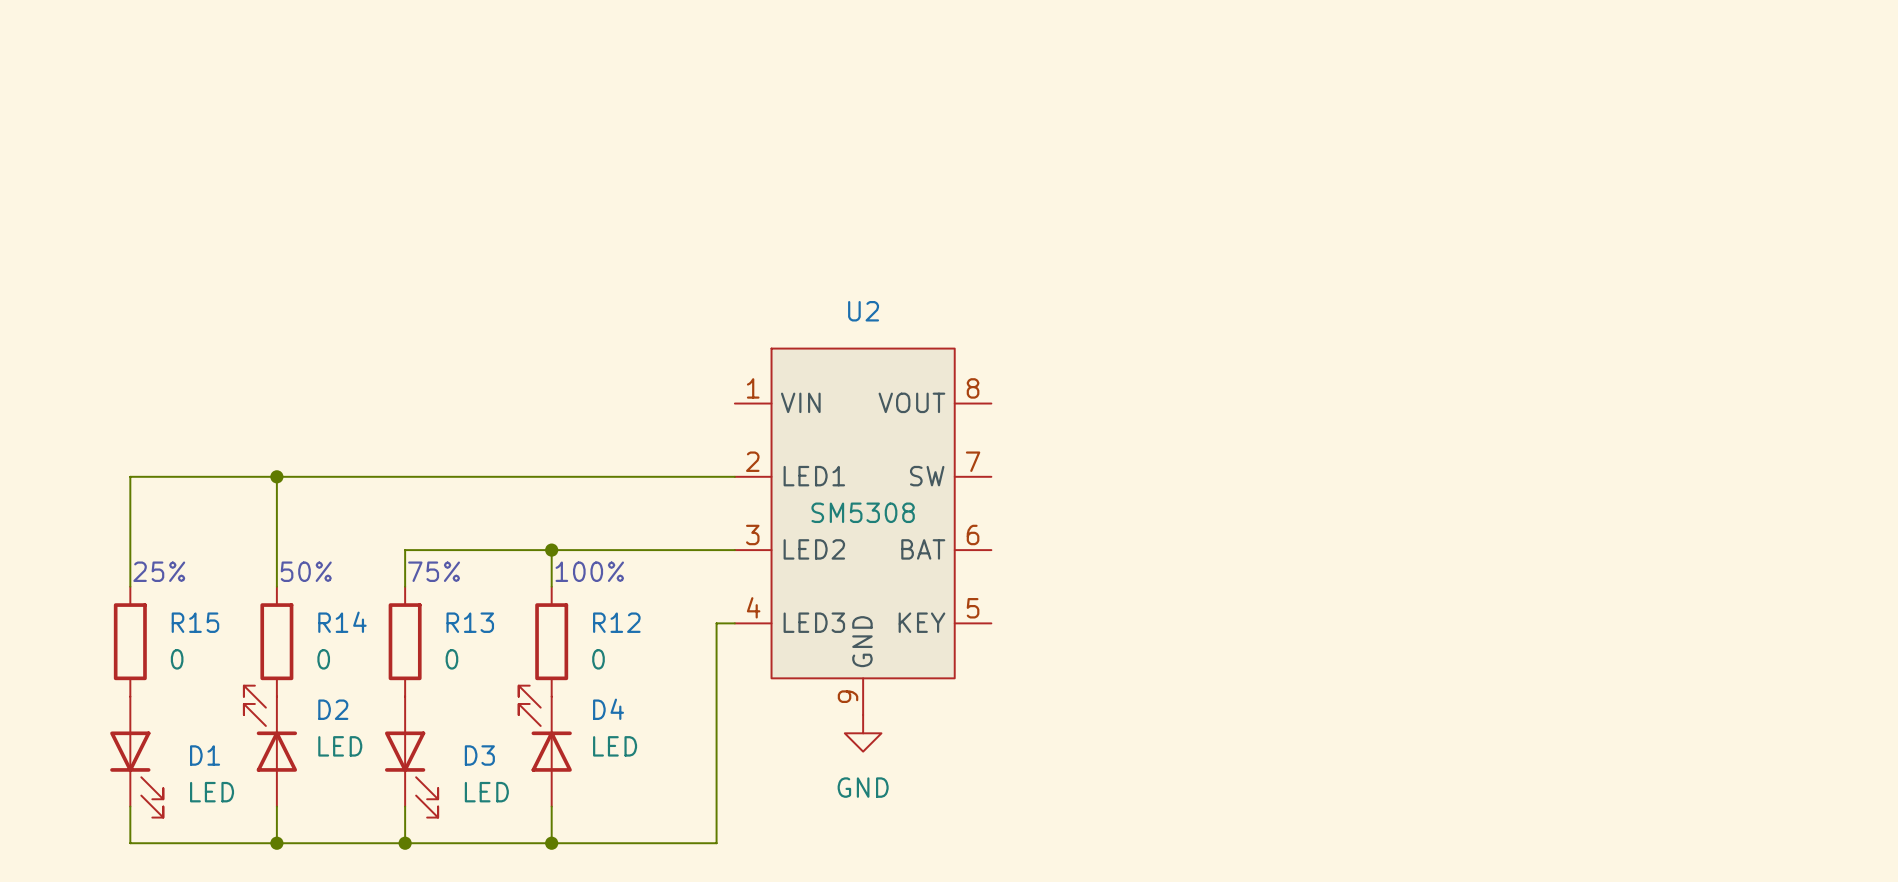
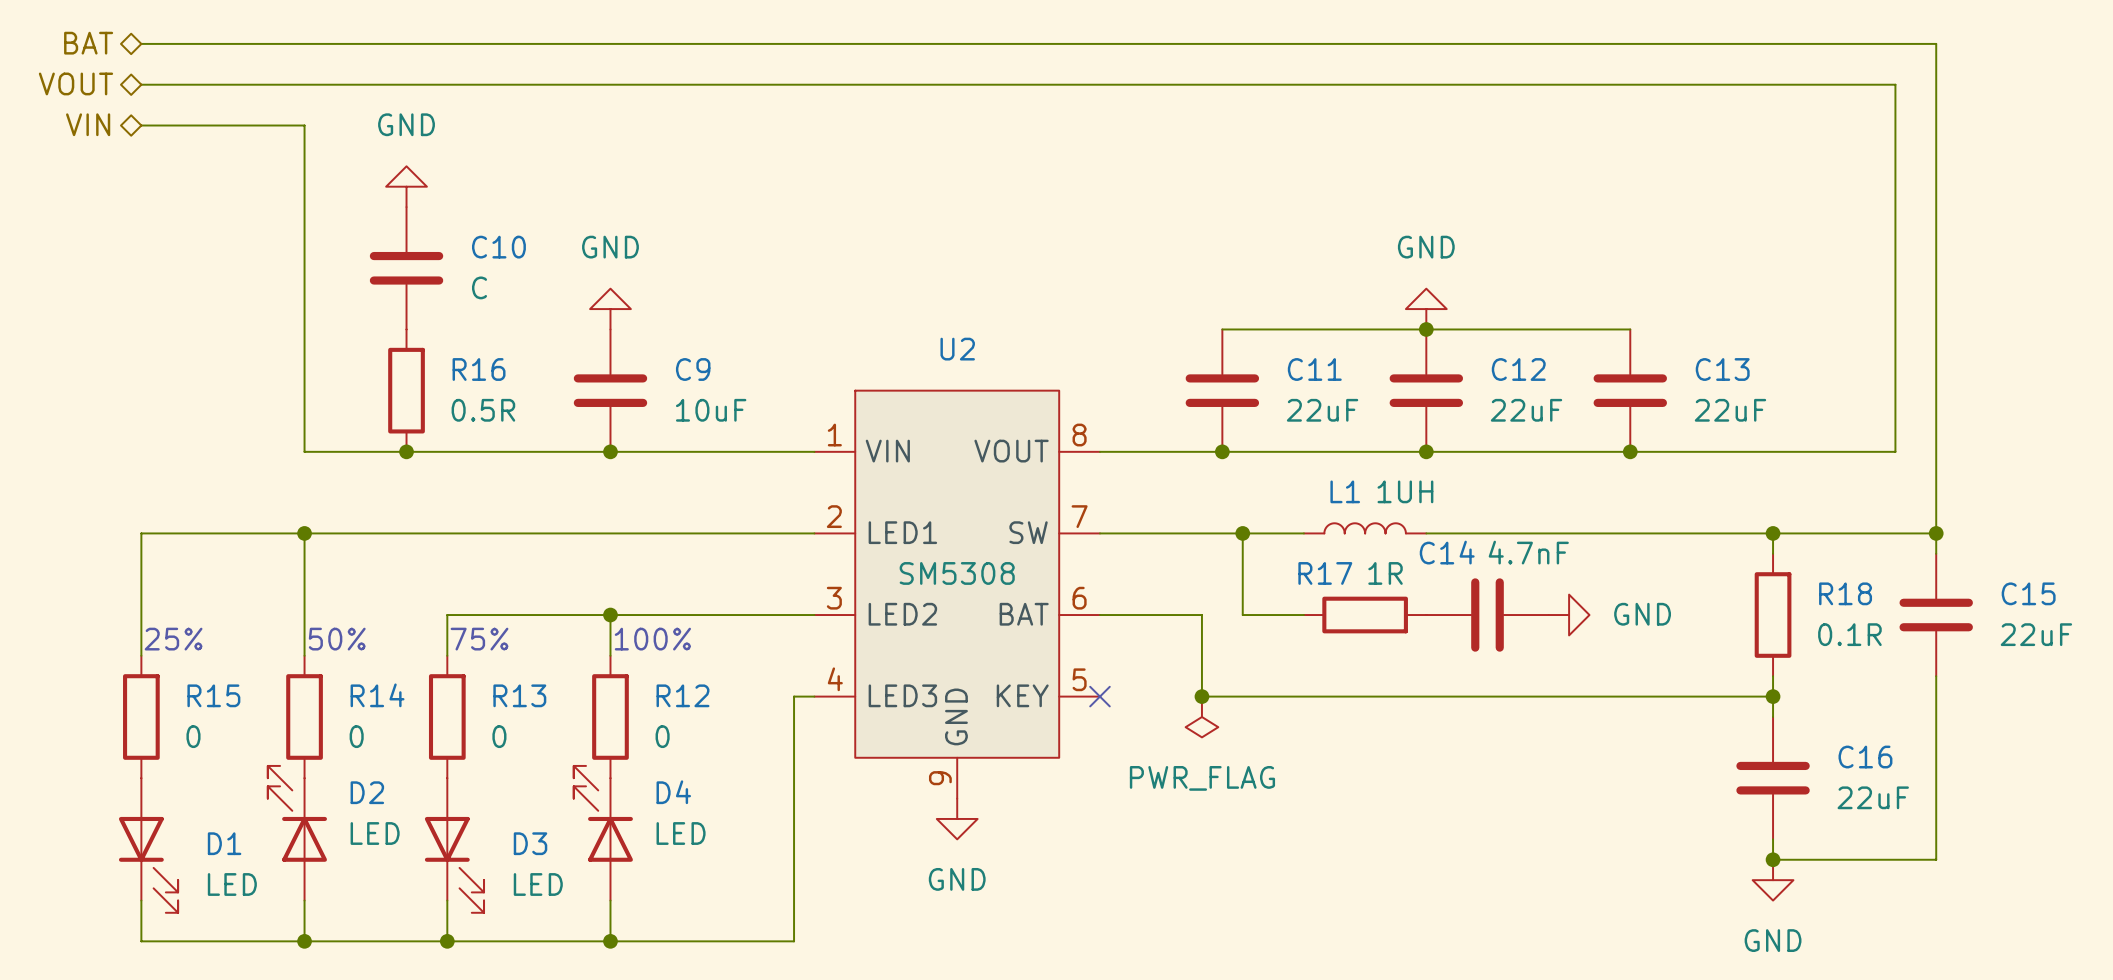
hierarchical label: none -> BAT (88, 43)
wire: none -> (141, 43) (1936, 43) (1936, 553)
hierarchical label: none -> VOUT (75, 83)
wire: none -> (141, 84) (1895, 84) (1895, 451) (1099, 451)
hierarchical label: none -> VIN (88, 124)
wire: none -> (141, 125) (304, 125) (304, 451) (814, 451)
power symbol: none -> GND (406, 186)
C10: none -> C (406, 268)
power symbol: none -> GND (610, 309)
power symbol: none -> GND (1426, 309)
wire: none -> (1222, 329) (1630, 329)
junction: none -> (1426, 329)
R16: none -> 0.5R (406, 390)
C9: none -> 10uF (610, 390)
C11: none -> 22uF (1222, 390)
C12: none -> 22uF (1426, 390)
C13: none -> 22uF (1630, 390)
junction: none -> (406, 451)
junction: none -> (610, 451)
junction: none -> (1222, 451)
junction: none -> (1426, 451)
junction: none -> (1630, 451)
L1: none -> 1UH (1365, 528)
wire: none -> (1099, 533) (1303, 533)
wire: none -> (1242, 533) (1242, 615) (1303, 615)
junction: none -> (1242, 533)
wire: none -> (1426, 533) (1936, 533)
wire: none -> (1773, 533) (1773, 553)
junction: none -> (1773, 533)
junction: none -> (1936, 533)
wire: none -> (1099, 615) (1201, 615) (1201, 696) (1773, 696)
R17: none -> 1R (1365, 615)
C14: none -> 4.7nF (1487, 615)
power symbol: none -> GND (1569, 615)
R18: none -> 0.1R (1773, 615)
C15: none -> 22uF (1936, 615)
wire: none -> (1773, 676) (1773, 716)
wire: none -> (1936, 676) (1936, 859) (1773, 859) (1773, 839)
no-connect mark: none -> (1099, 696)
junction: none -> (1201, 696)
junction: none -> (1773, 696)
power symbol: none -> PWR_FLAG (1201, 716)
C16: none -> 22uF (1773, 778)
junction: none -> (1773, 859)
power symbol: none -> GND (1773, 880)

